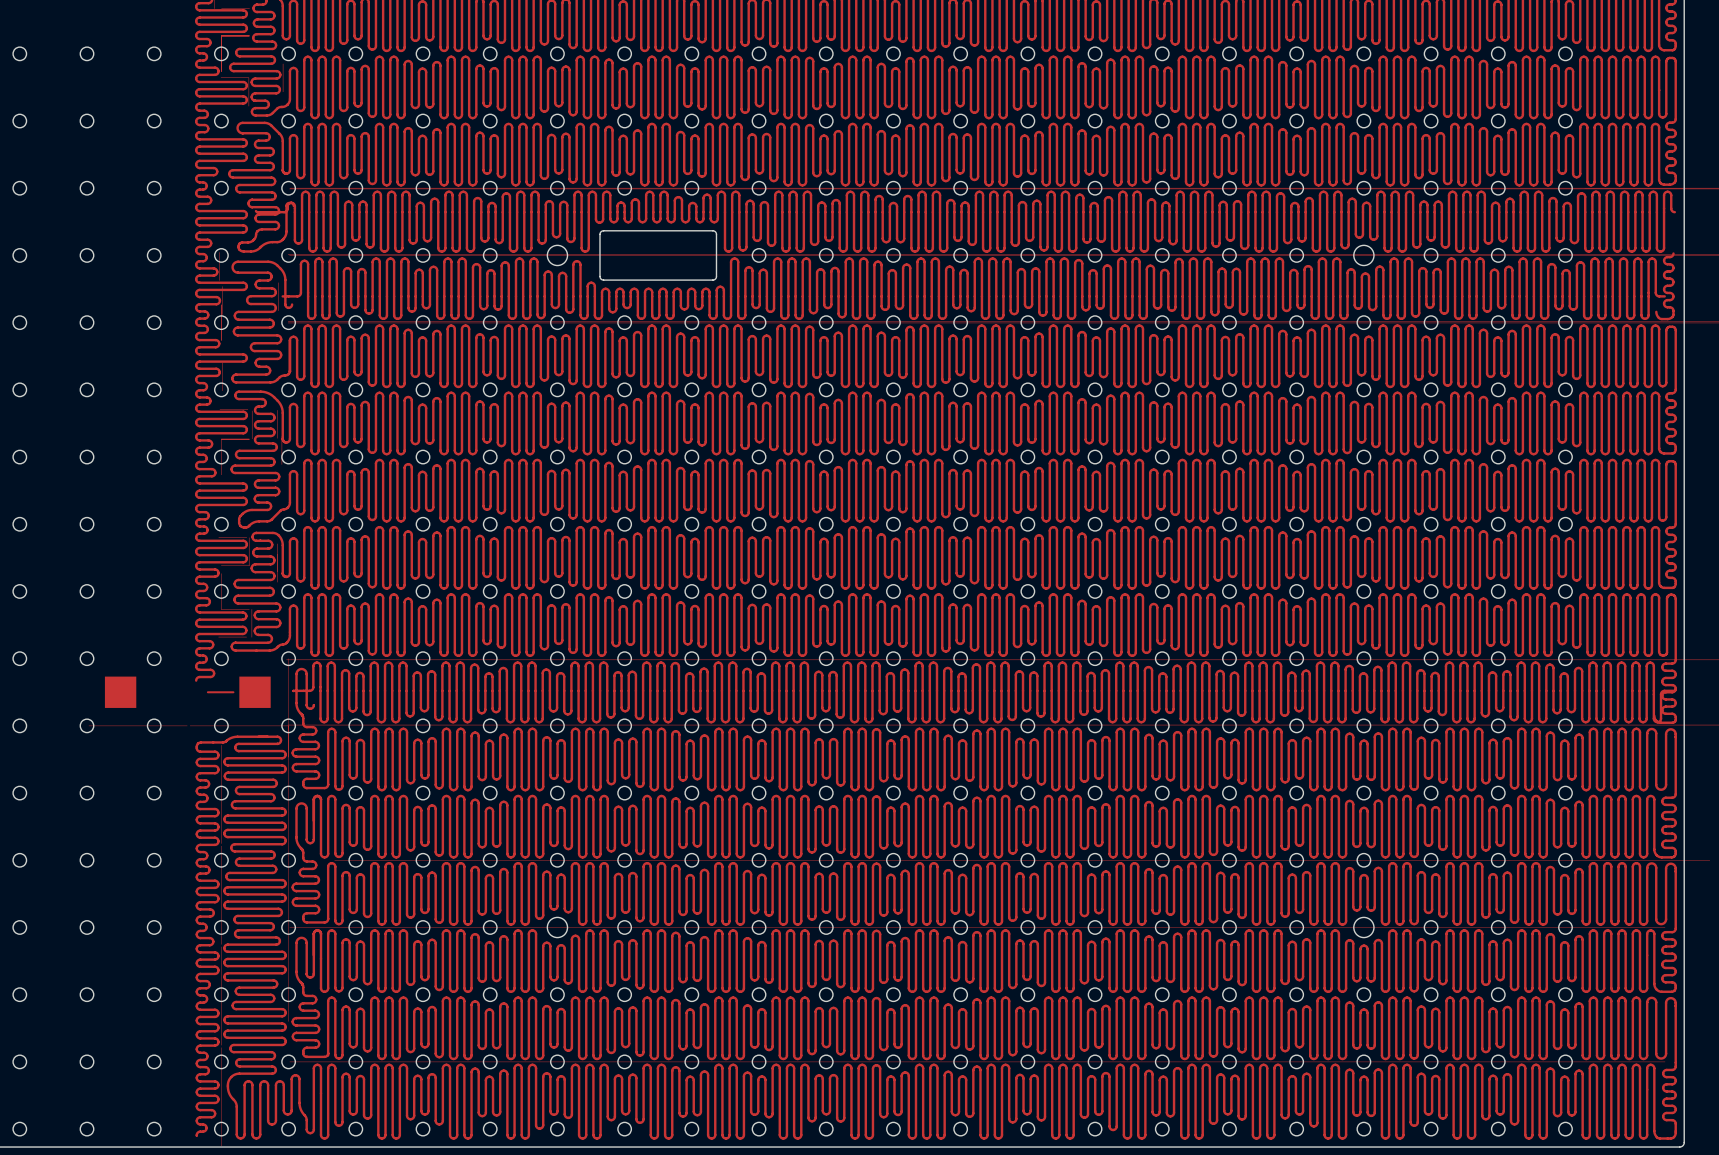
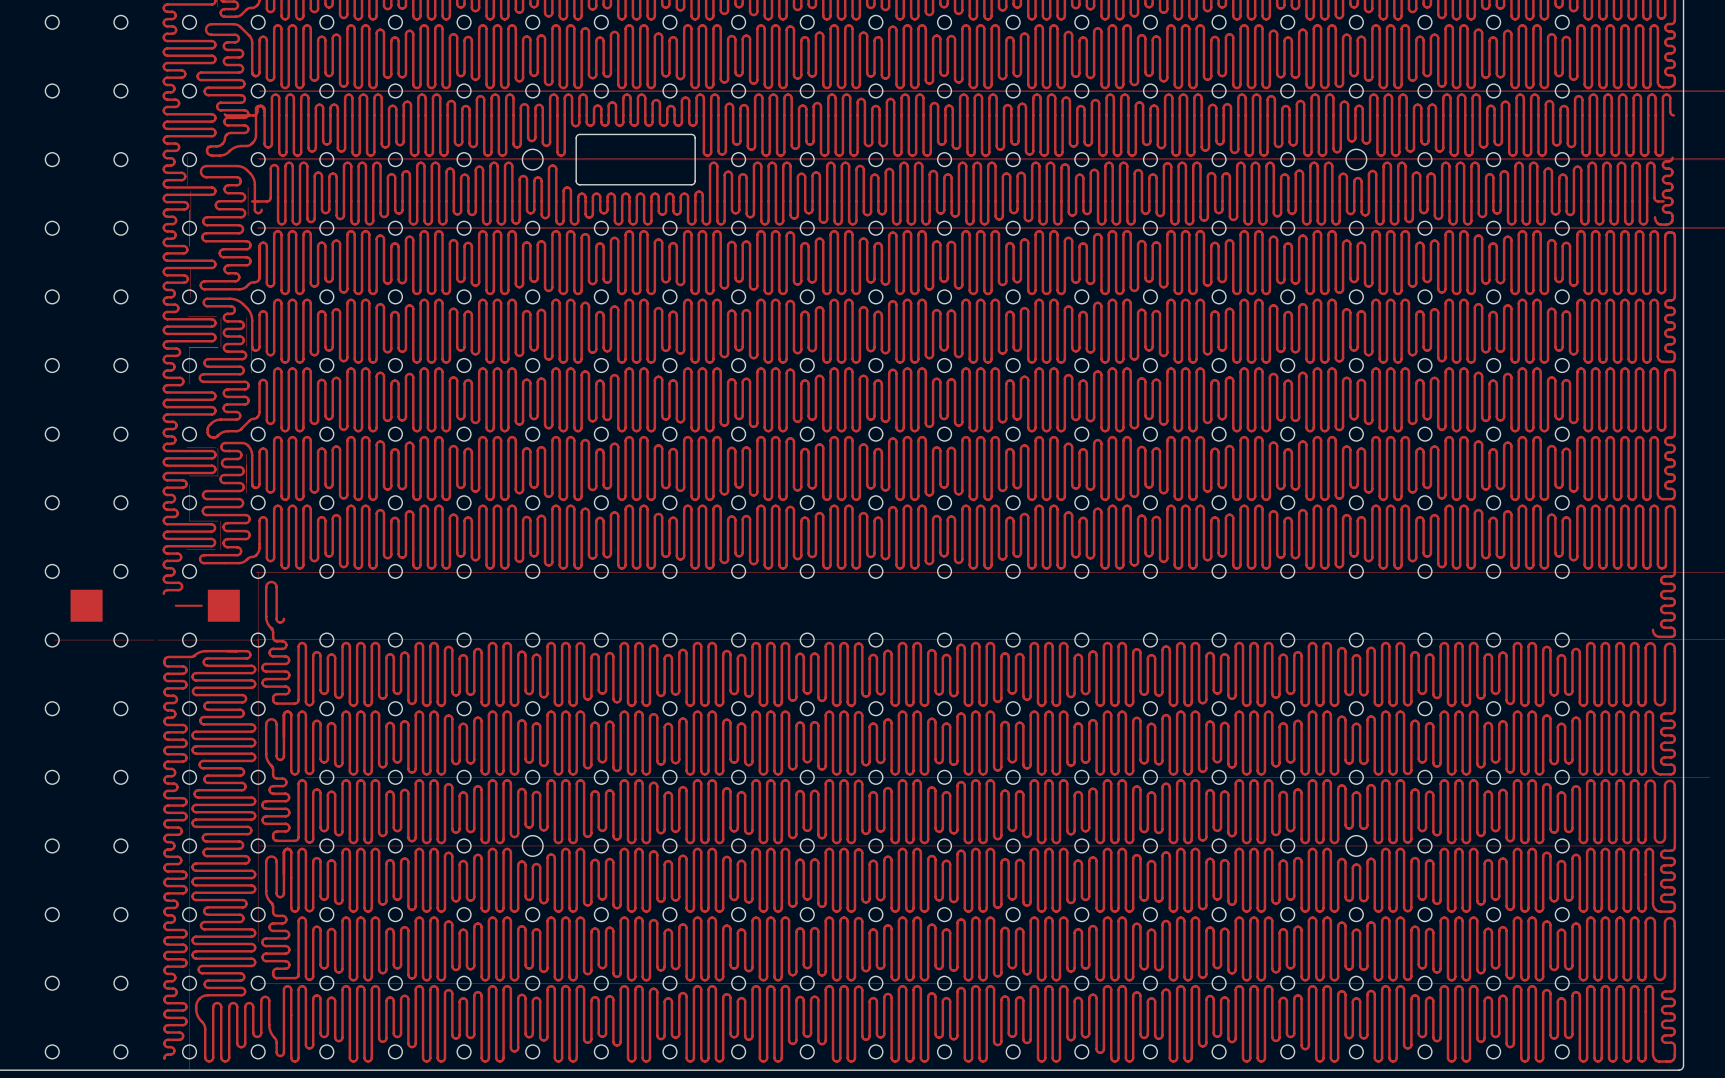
top track: (1675, 690) (1661, 692) (1660, 719) (1657, 722) (1653, 719) (1653, 666) (1650, 662) (1646, 666) (1646, 719) (1643, 722) (1639, 718) (1639, 665) (1635, 662) (1632, 666) (1632, 719) (1628, 722) (1625, 718) (1625, 665) (1621, 662) (1618, 665) (1618, 718) (1614, 722) (1610, 719) (1610, 666) (1607, 662) (1603, 665) (1603, 718) (1600, 722) (1596, 718) (1596, 665) (1592, 662) (1589, 665) (1589, 718) (1585, 722) (1582, 719) (1581, 669) (1578, 668) (1575, 670) (1574, 709) (1572, 712) (1567, 709) (1567, 676) (1564, 673) (1561, 675) (1560, 710) (1556, 713) (1553, 710) (1553, 667) (1549, 664) (1546, 667) (1546, 719) (1543, 722) (1539, 720) (1539, 665) (1535, 662) (1532, 665) (1531, 718) (1528, 722) (1524, 718) (1524, 665) (1521, 662) (1517, 665) (1517, 717) (1514, 720) (1510, 717) (1509, 672) (1506, 671) (1503, 674) (1503, 708) (1500, 711) (1496, 708) (1496, 675) (1493, 672) (1489, 674) (1488, 713) (1484, 716) (1481, 712) (1481, 665) (1479, 662) (1475, 664) (1474, 719) (1471, 722) (1467, 719) (1467, 666) (1463, 662) (1460, 665) (1460, 718) (1456, 722) (1453, 718) (1453, 665) (1449, 662) (1445, 665) (1445, 713) (1441, 715) (1438, 712) (1438, 676) (1435, 672) (1431, 676) (1431, 708) (1428, 711) (1424, 709) (1424, 673) (1419, 670) (1417, 673) (1417, 719) (1413, 722) (1410, 719) (1410, 666) (1406, 662) (1402, 666) (1402, 719) (1399, 722) (1395, 719) (1395, 666) (1392, 662) (1388, 665) (1388, 718) (1385, 722) (1381, 719) (1380, 668) (1377, 666) (1374, 669) (1374, 708) (1371, 712) (1367, 709) (1366, 676) (1363, 673) (1360, 675) (1359, 709) (1355, 712) (1352, 709) (1352, 669) (1349, 665) (1345, 669) (1345, 719) (1342, 722) (1339, 720) (1338, 665) (1334, 662) (1331, 666) (1331, 719) (1327, 722) (1324, 718) (1324, 665) (1320, 662) (1316, 666) (1316, 718) (1313, 721) (1309, 718) (1309, 674) (1307, 670) (1302, 673) (1302, 709) (1298, 711) (1295, 708) (1295, 675) (1290, 672) (1288, 675) (1288, 713) (1285, 715) (1281, 713) (1281, 665) (1277, 662) (1273, 665) (1273, 718) (1270, 722) (1266, 718) (1266, 665) (1263, 662) (1259, 666) (1259, 719) (1256, 722) (1252, 719) (1252, 666) (1248, 662) (1245, 665) (1244, 713) (1241, 715) (1238, 713) (1238, 675) (1235, 672) (1230, 675) (1230, 708) (1227, 711) (1224, 709) (1223, 674) (1219, 671) (1216, 674) (1216, 718) (1212, 721) (1209, 717) (1209, 665) (1206, 662) (1202, 664) (1202, 719) (1198, 722) (1195, 718) (1195, 665) (1191, 662) (1187, 665) (1187, 718) (1184, 722) (1180, 719) (1180, 668) (1177, 665) (1173, 668) (1173, 709) (1170, 712) (1166, 709) (1166, 676) (1163, 673) (1159, 676) (1159, 709) (1156, 712) (1152, 710) (1152, 670) (1149, 667) (1145, 668) (1144, 719) (1142, 722) (1138, 720) (1137, 665) (1134, 662) (1130, 665) (1130, 718) (1126, 722) (1123, 718) (1123, 665) (1119, 662) (1116, 666) (1116, 719) (1112, 722) (1109, 719) (1109, 673) (1106, 670) (1101, 673) (1101, 709) (1097, 711) (1094, 708) (1094, 676) (1090, 672) (1087, 676) (1087, 712) (1084, 714) (1080, 713) (1080, 665) (1076, 662) (1073, 666) (1073, 719) (1069, 722) (1066, 719) (1066, 666) (1062, 662) (1058, 665) (1058, 718) (1055, 722) (1051, 719) (1051, 666) (1048, 662) (1044, 665) (1044, 714) (1040, 716) (1037, 713) (1037, 675) (1034, 672) (1030, 675) (1030, 708) (1027, 711) (1023, 709) (1022, 674) (1018, 671) (1015, 674) (1015, 716) (1012, 719) (1008, 716) (1008, 665) (1006, 662) (1002, 664) (1001, 719) (997, 722) (994, 719) (994, 666) (990, 662) (987, 665) (987, 718) (983, 722) (980, 719) (979, 667) (976, 664) (972, 667) (972, 710) (969, 713) (965, 710) (965, 675) (961, 673) (958, 676) (958, 709) (953, 712) (951, 709) (951, 670) (948, 668) (944, 669) (944, 719) (940, 722) (937, 718) (936, 665) (933, 662) (929, 666) (929, 719) (926, 722) (922, 719) (922, 666) (919, 662) (915, 666) (915, 719) (911, 722) (908, 719) (907, 671) (904, 669) (901, 672) (901, 708) (898, 711) (894, 708) (893, 675) (890, 673) (887, 674) (886, 711) (882, 714) (879, 710) (879, 665) (876, 662) (872, 665) (872, 718) (868, 722) (865, 719) (865, 666) (861, 662) (858, 666) (858, 719) (854, 722) (850, 718) (850, 665) (847, 662) (843, 665) (843, 715) (839, 717) (836, 715) (836, 675) (833, 672) (829, 675) (829, 708) (826, 711) (822, 709) (822, 674) (818, 671) (815, 674) (815, 715) (811, 718) (808, 715) (807, 665) (805, 662) (801, 664) (800, 719) (797, 722) (793, 719) (793, 666) (790, 662) (786, 666) (786, 719) (782, 722) (779, 718) (779, 665) (775, 662) (772, 665) (772, 710) (769, 713) (764, 710) (764, 675) (760, 673) (757, 676) (757, 708) (753, 711) (750, 708) (750, 671) (747, 668) (743, 670) (743, 719) (739, 722) (736, 719) (736, 666) (733, 662) (729, 665) (729, 718) (725, 722) (721, 719) (721, 666) (718, 662) (714, 665) (714, 718) (711, 722) (707, 719) (707, 670) (703, 668) (700, 671) (700, 708) (697, 711) (693, 708) (693, 676) (690, 673) (686, 675) (686, 710) (681, 713) (678, 710) (678, 666) (675, 663) (671, 666) (671, 718) (668, 722) (664, 719) (664, 666) (661, 662) (657, 665) (657, 718) (654, 722) (650, 719) (650, 666) (647, 662) (643, 665) (643, 715) (639, 718) (635, 715) (635, 674) (632, 671) (628, 674) (628, 709) (624, 711) (621, 708) (621, 675) (617, 672) (614, 675) (614, 714) (611, 717) (607, 715) (607, 665) (604, 662) (600, 665) (600, 718) (596, 722) (592, 719) (592, 666) (589, 662) (585, 665) (585, 718) (582, 722) (578, 719) (578, 666) (575, 662) (571, 665) (571, 710) (568, 714) (564, 711) (563, 674) (560, 673) (557, 675) (557, 708) (553, 711) (549, 708) (549, 672) (546, 669) (543, 671) (542, 719) (539, 722) (535, 719) (535, 666) (532, 662) (528, 665) (528, 718) (525, 722) (521, 719) (521, 666) (518, 662) (514, 665) (514, 718) (510, 722) (506, 719) (506, 671) (503, 668) (499, 671) (499, 709) (496, 712) (492, 709) (492, 676) (488, 673) (485, 676) (485, 710) (481, 713) (478, 710) (478, 667) (475, 664) (471, 666) (471, 718) (467, 722) (463, 719) (463, 666) (460, 662) (456, 665) (456, 718) (453, 722) (449, 719) (449, 666) (446, 662) (442, 665) (442, 716) (439, 720) (435, 717) (435, 674) (432, 671) (428, 674) (427, 709) (423, 711) (420, 708) (420, 675) (416, 672) (413, 675) (413, 713) (410, 716) (407, 714) (406, 666) (403, 662) (399, 665) (399, 718) (396, 722) (392, 719) (392, 666) (389, 662) (385, 665) (385, 718) (382, 722) (377, 719) (377, 666) (375, 662) (370, 665) (370, 711) (368, 714) (363, 711) (363, 676) (360, 673) (356, 676) (356, 708) (353, 711) (349, 709) (349, 673) (345, 670) (342, 673) (341, 719) (339, 722) (335, 720) (334, 666) (332, 662) (327, 665) (326, 721) (322, 721) (320, 719) (319, 663) (316, 662) (313, 665) (312, 689) (293, 691) -> none

